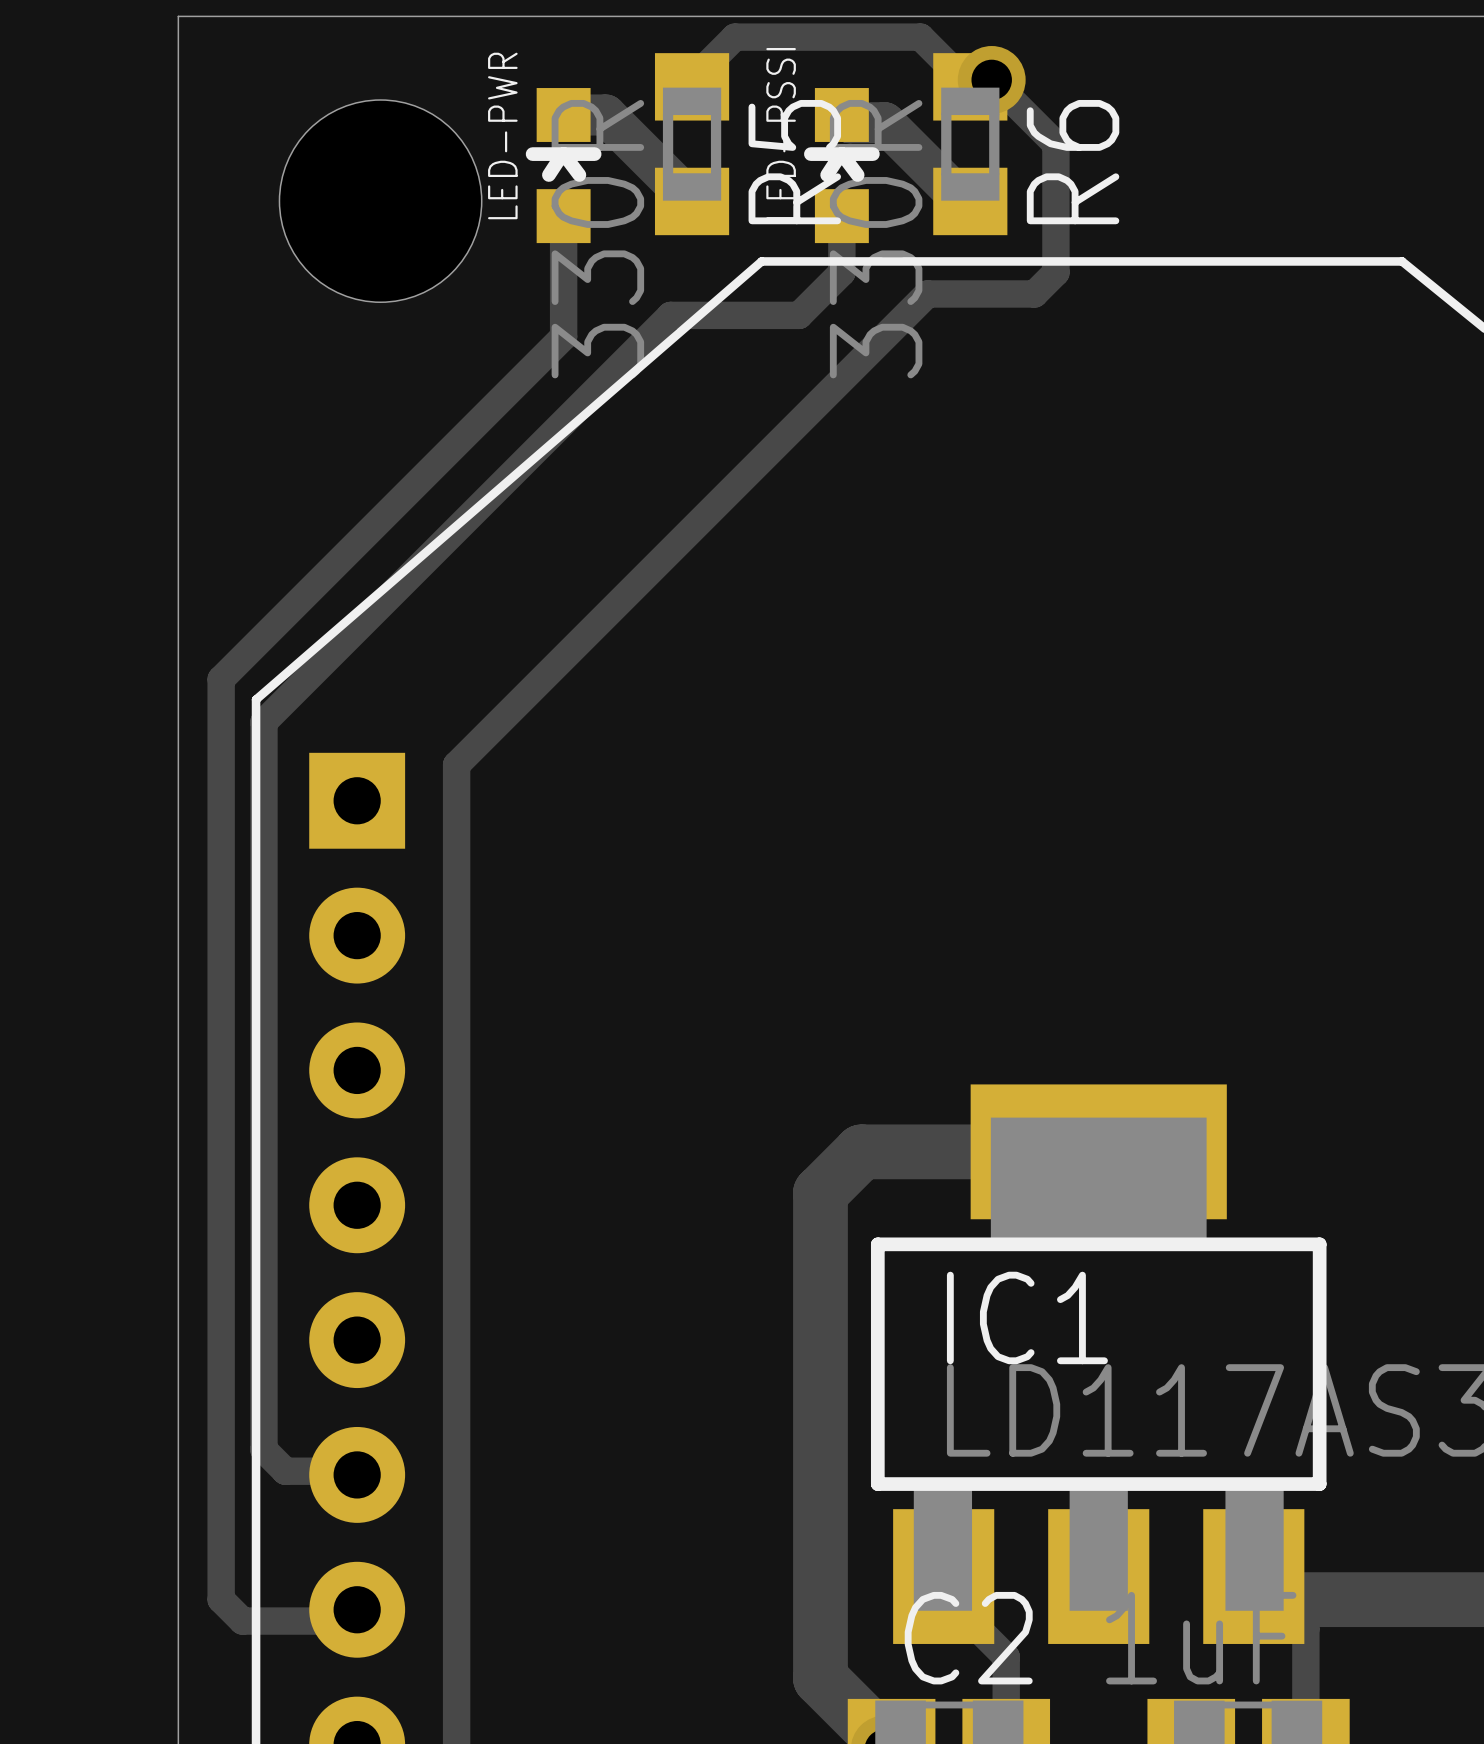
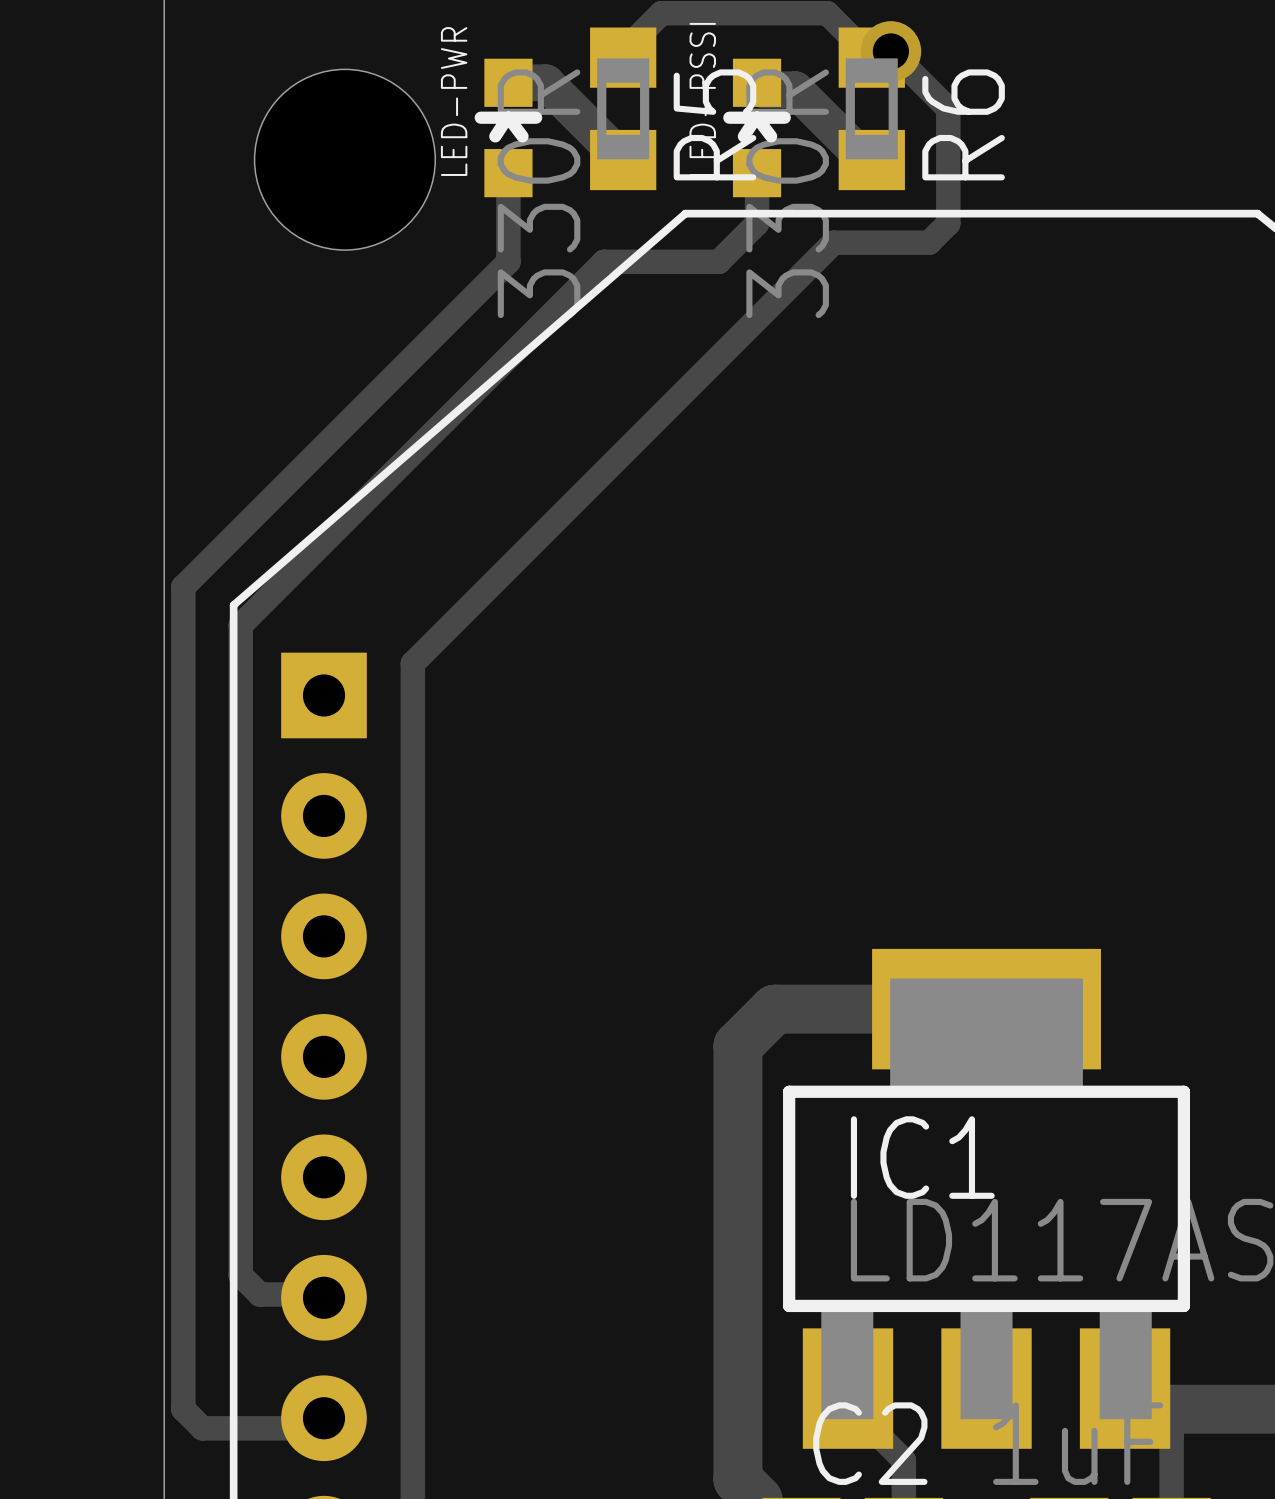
track: (563, 315) (563, 336) (221, 679) (221, 1599) (242, 1621) -> (508, 261) (183, 586) (183, 1409) (202, 1428) (221, 1428)

